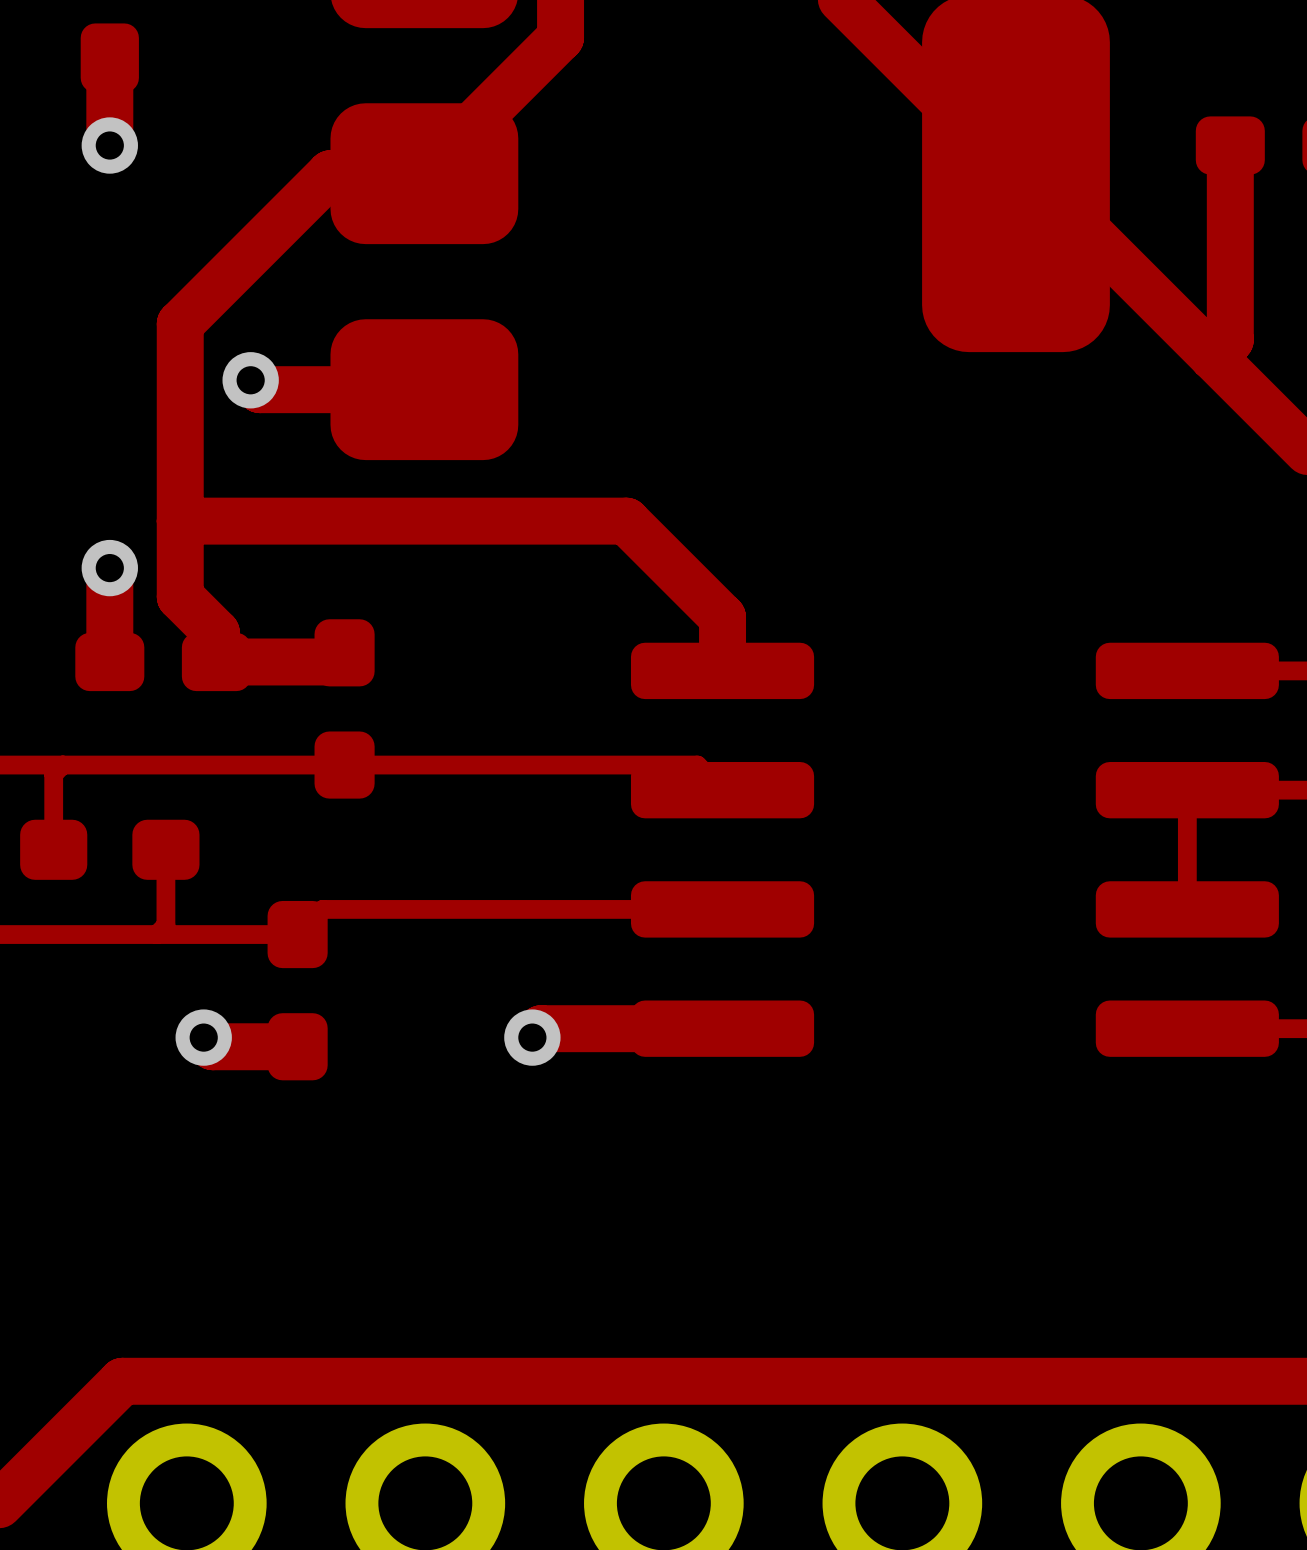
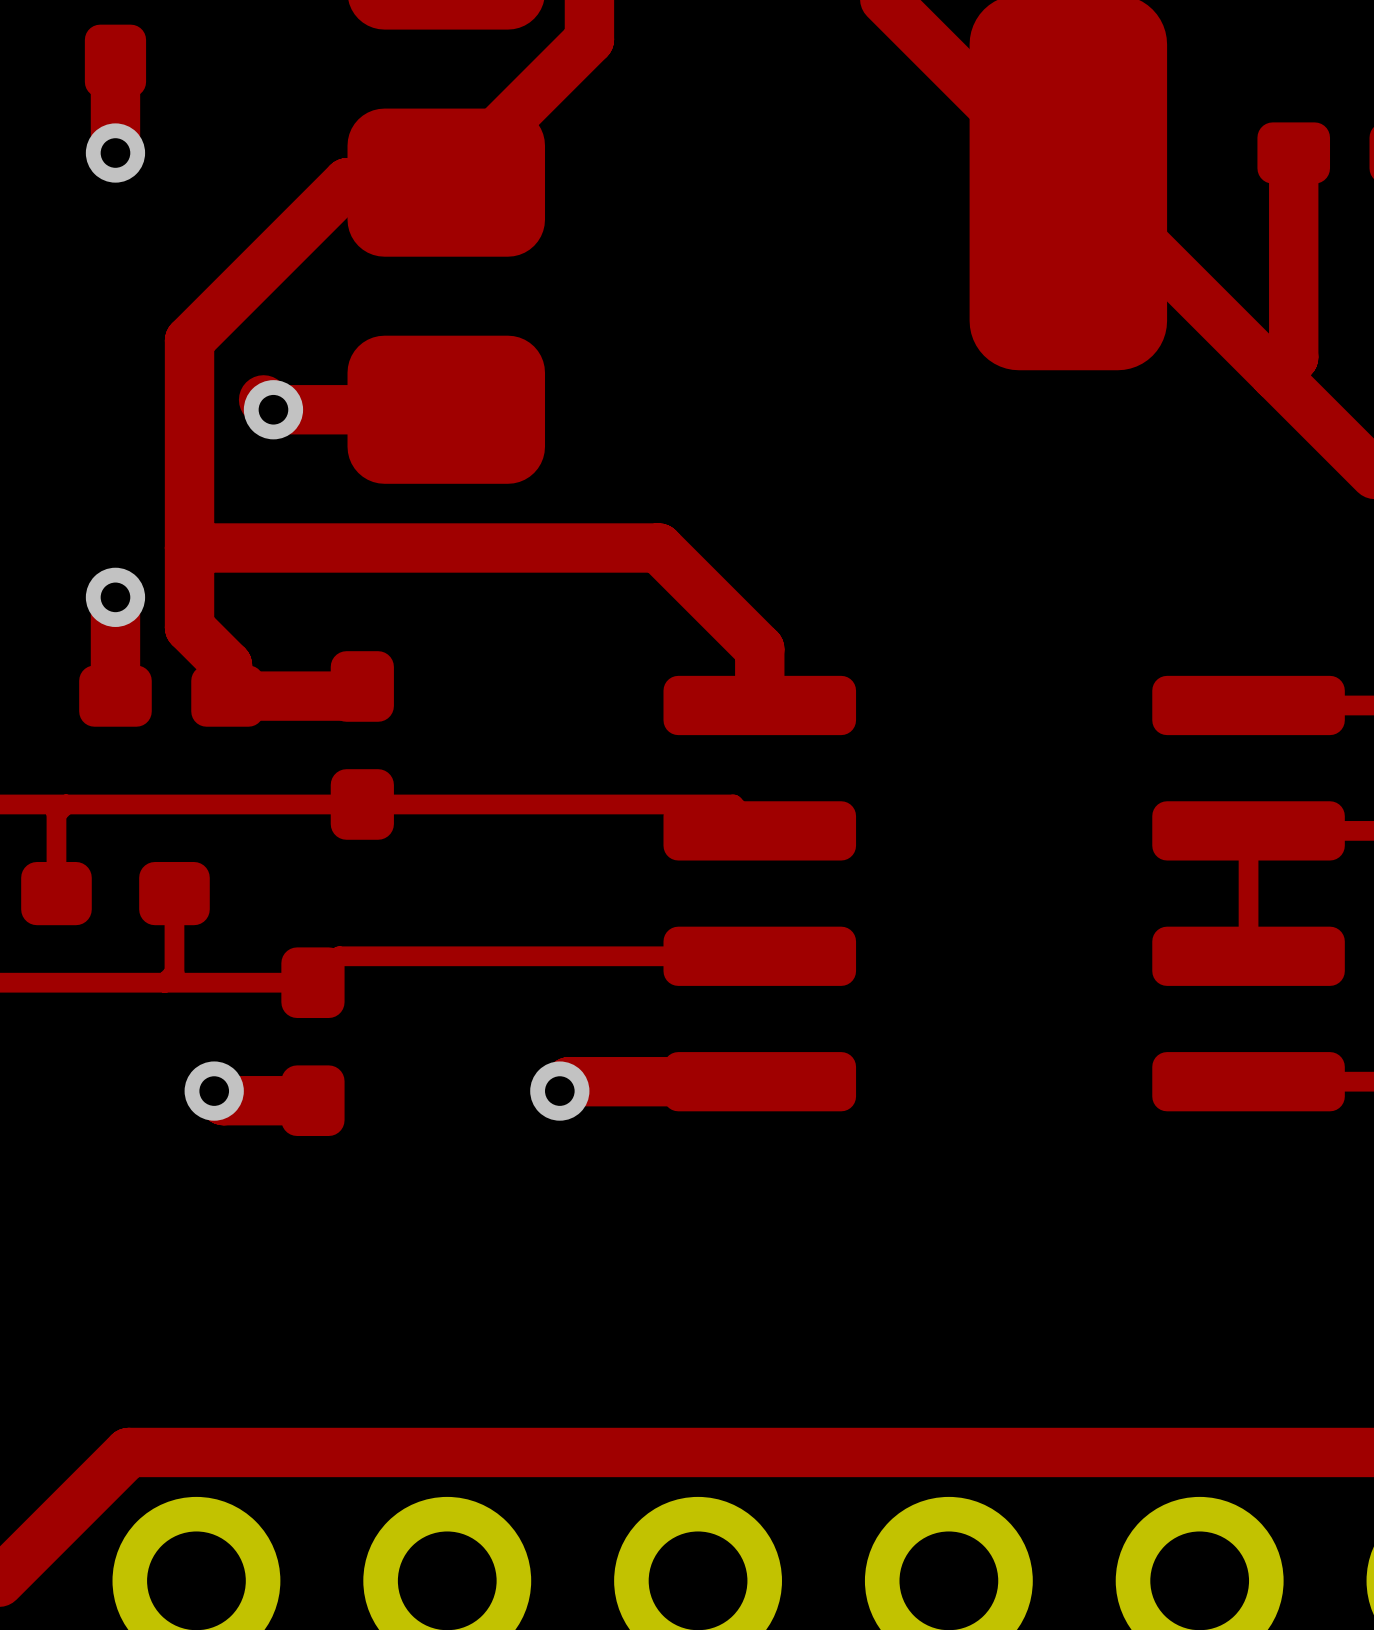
via position: (250, 380) -> (273, 409)

